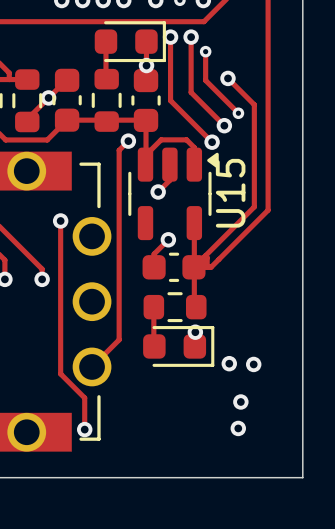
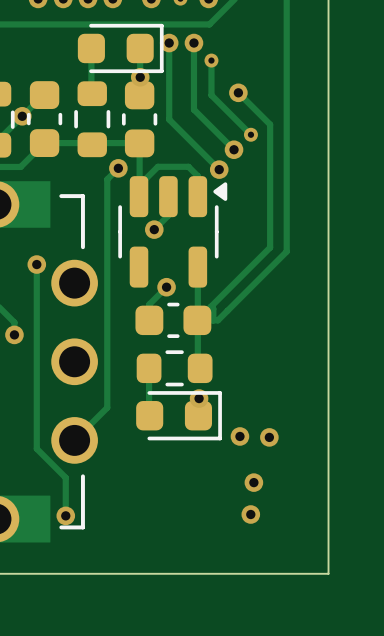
U15 name: U15 (230, 193) -> none

